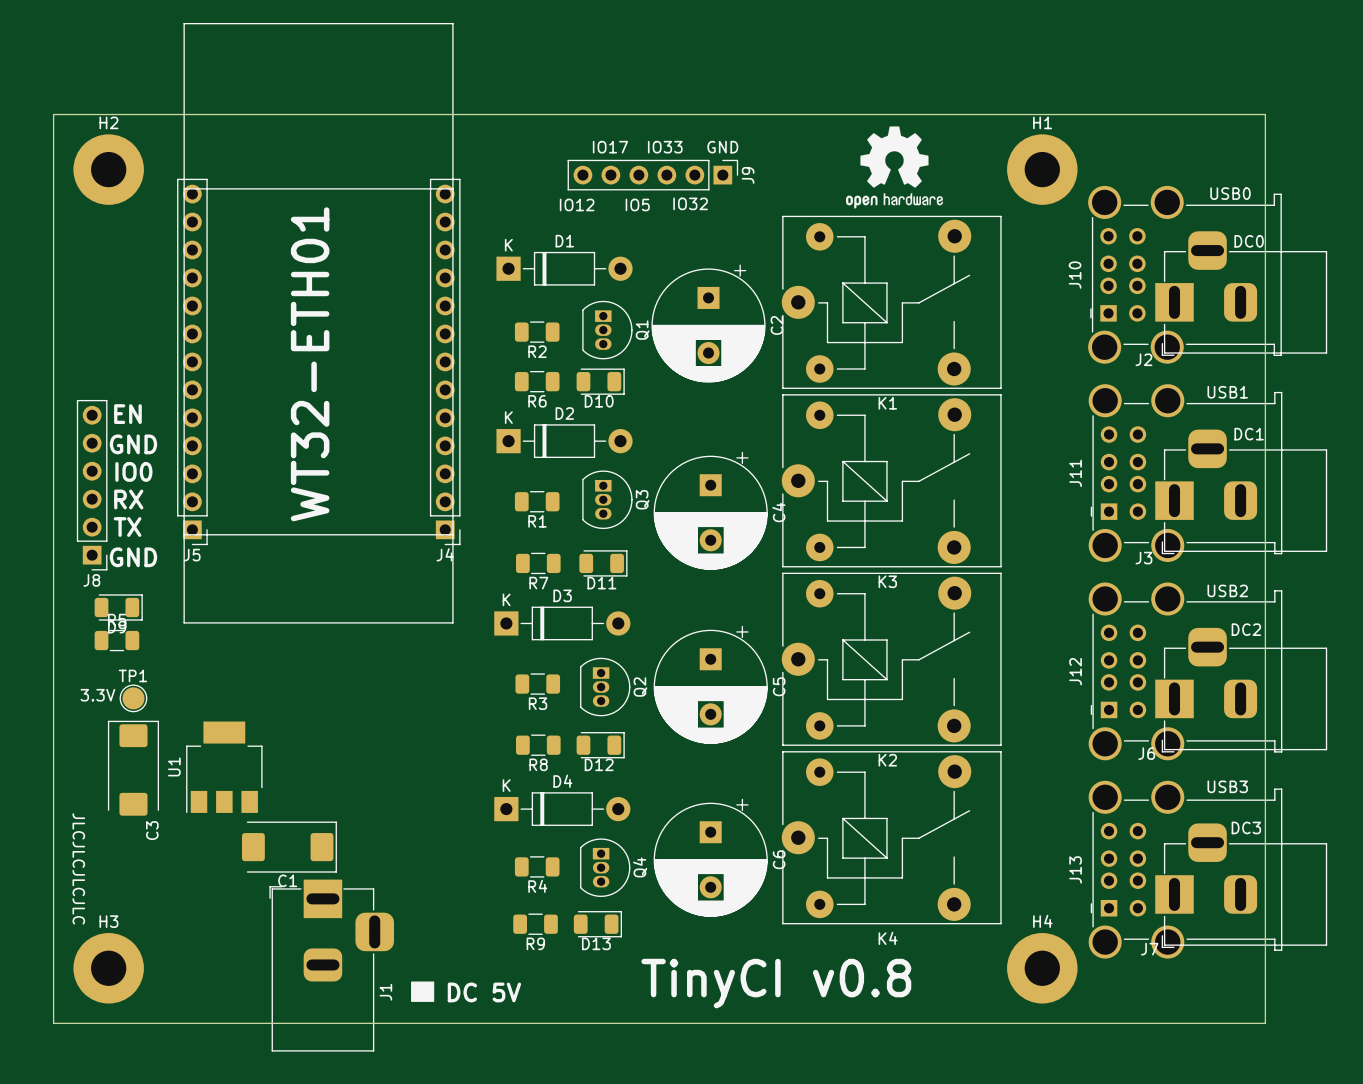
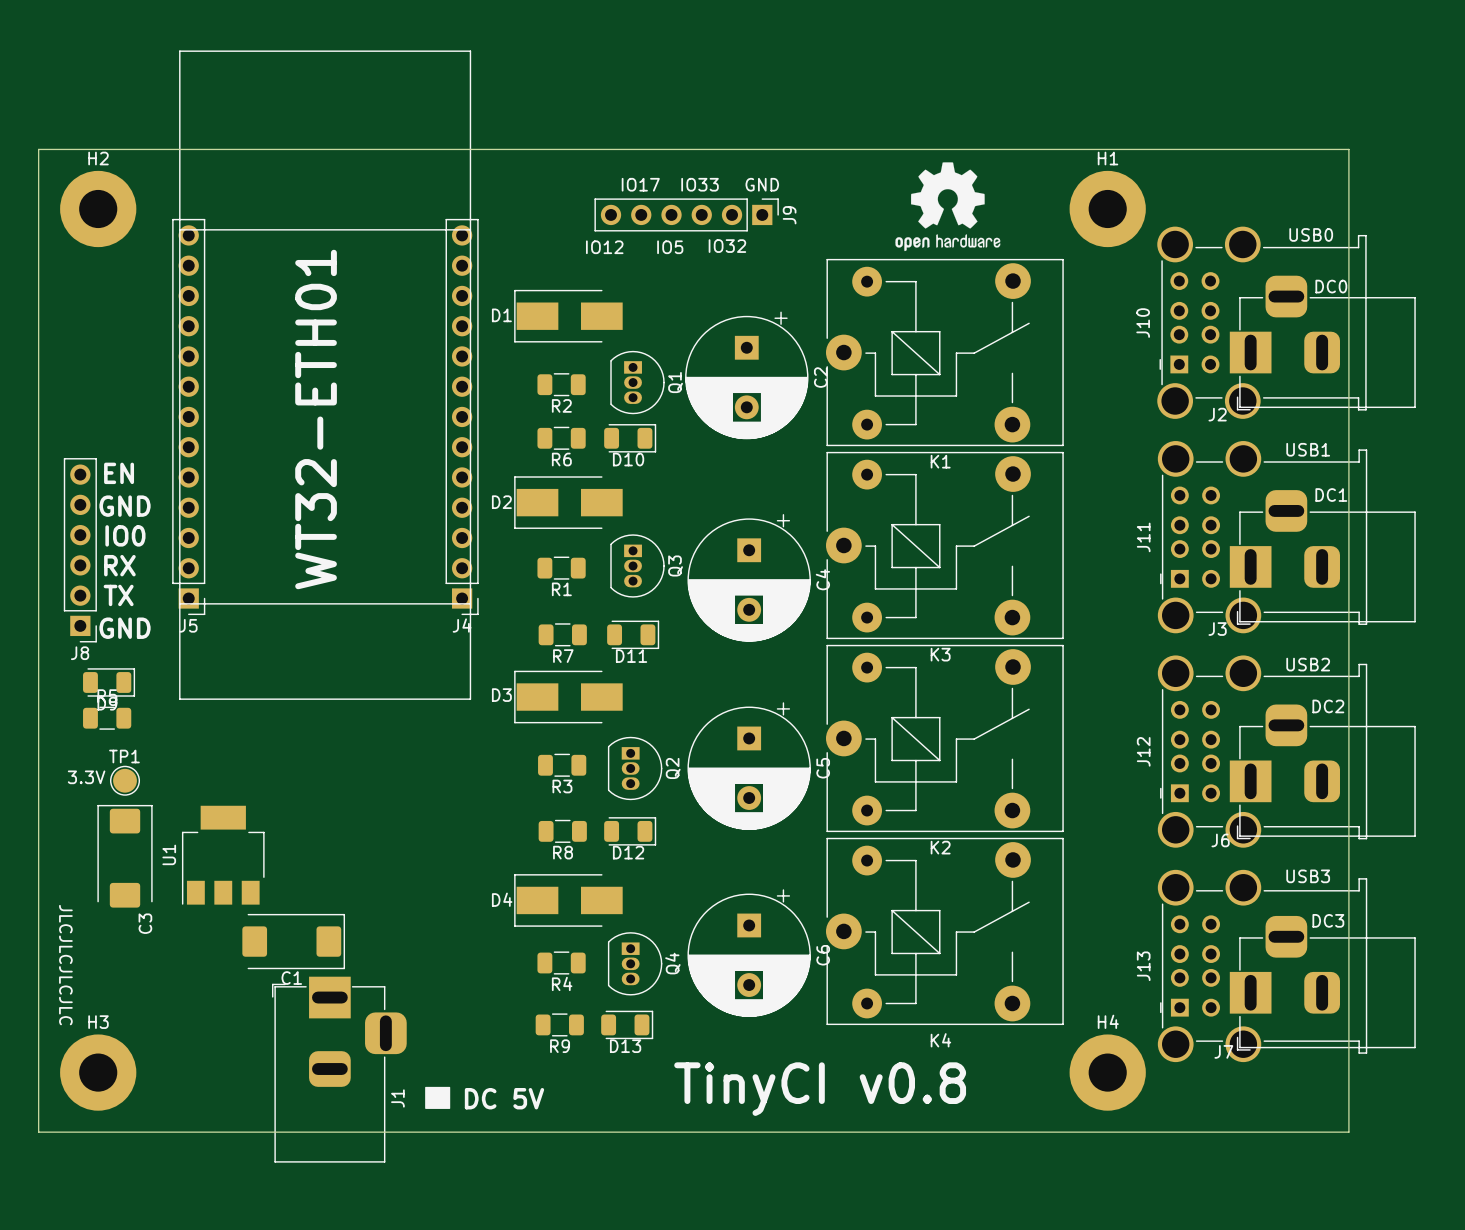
D1 name position: D1 (564, 241) -> D1 (501, 315)
D1 footprint: [496, 251, 633, 286] -> [514, 289, 623, 343]
D2 name position: D2 (564, 413) -> D2 (501, 502)
D2 footprint: [496, 424, 633, 459] -> [514, 476, 623, 529]
D3 name position: D3 (562, 595) -> D3 (501, 695)
D3 footprint: [494, 606, 631, 641] -> [514, 670, 623, 724]
D4 name position: D4 (562, 781) -> D4 (502, 899)
D4 footprint: [494, 792, 631, 826] -> [514, 874, 623, 927]

